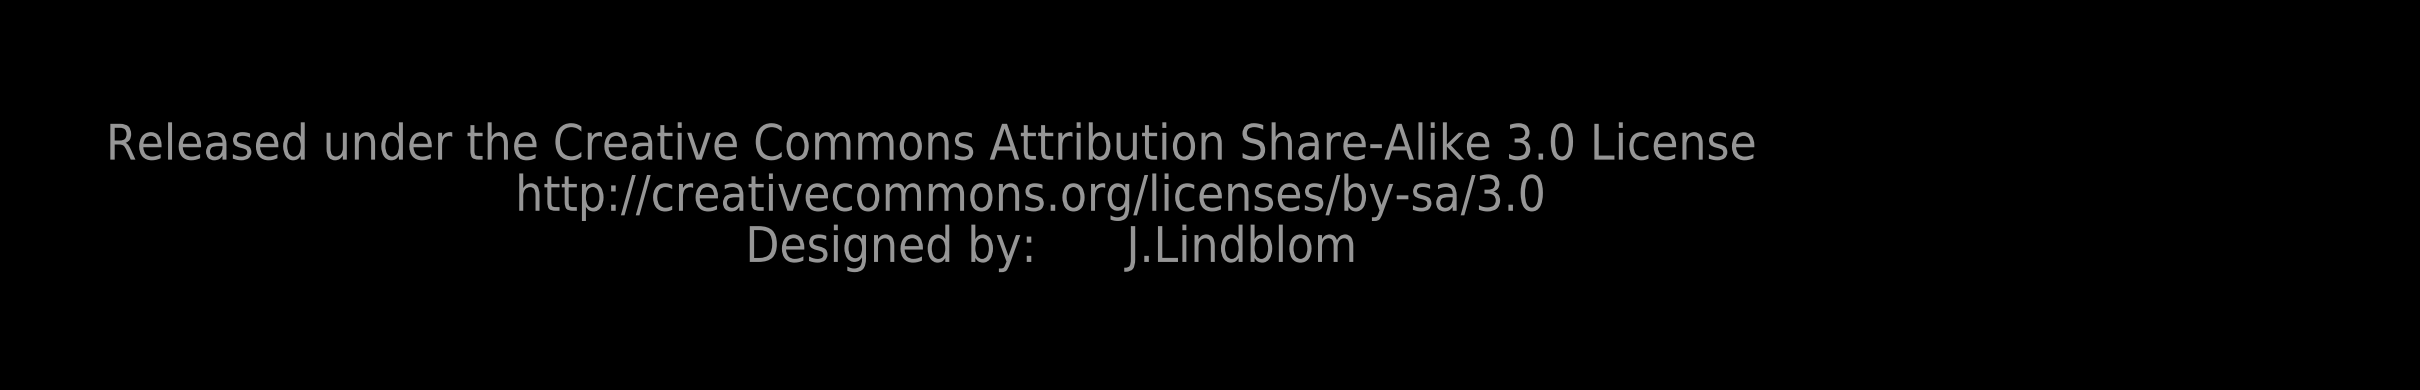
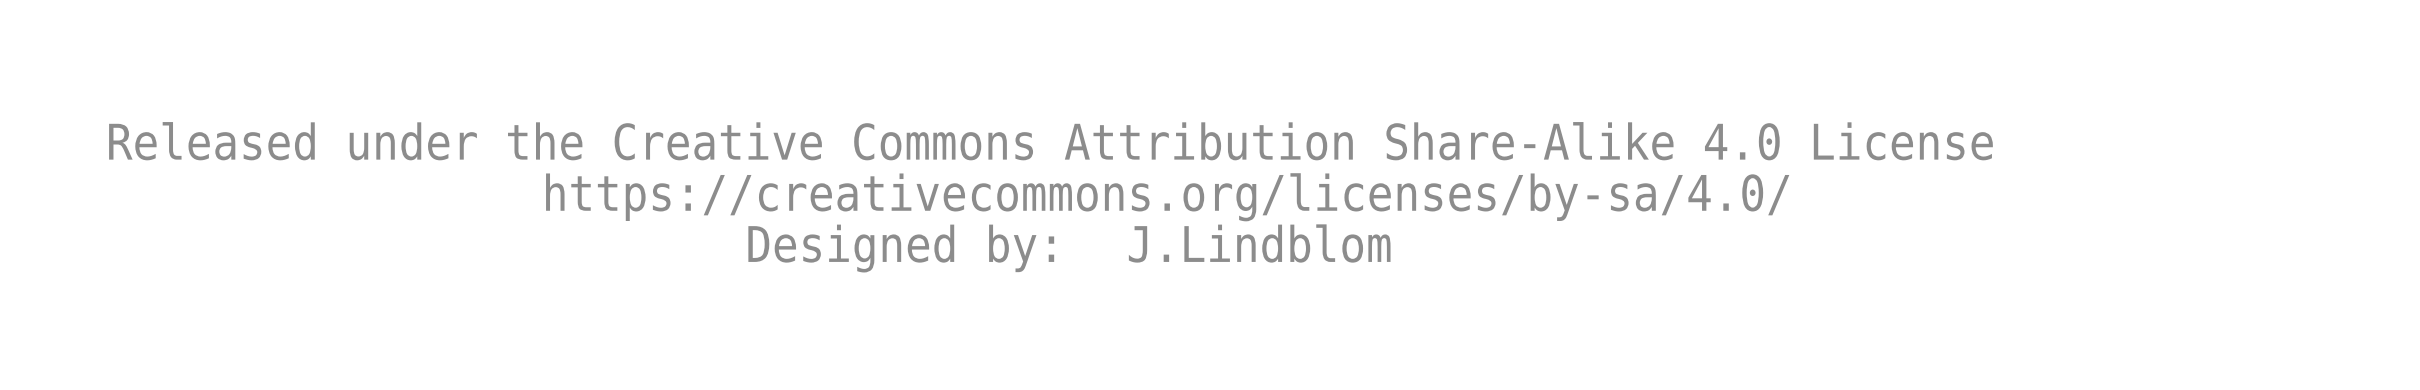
drawing shape: [110, 122, 1755, 273] -> [109, 122, 1993, 273]

